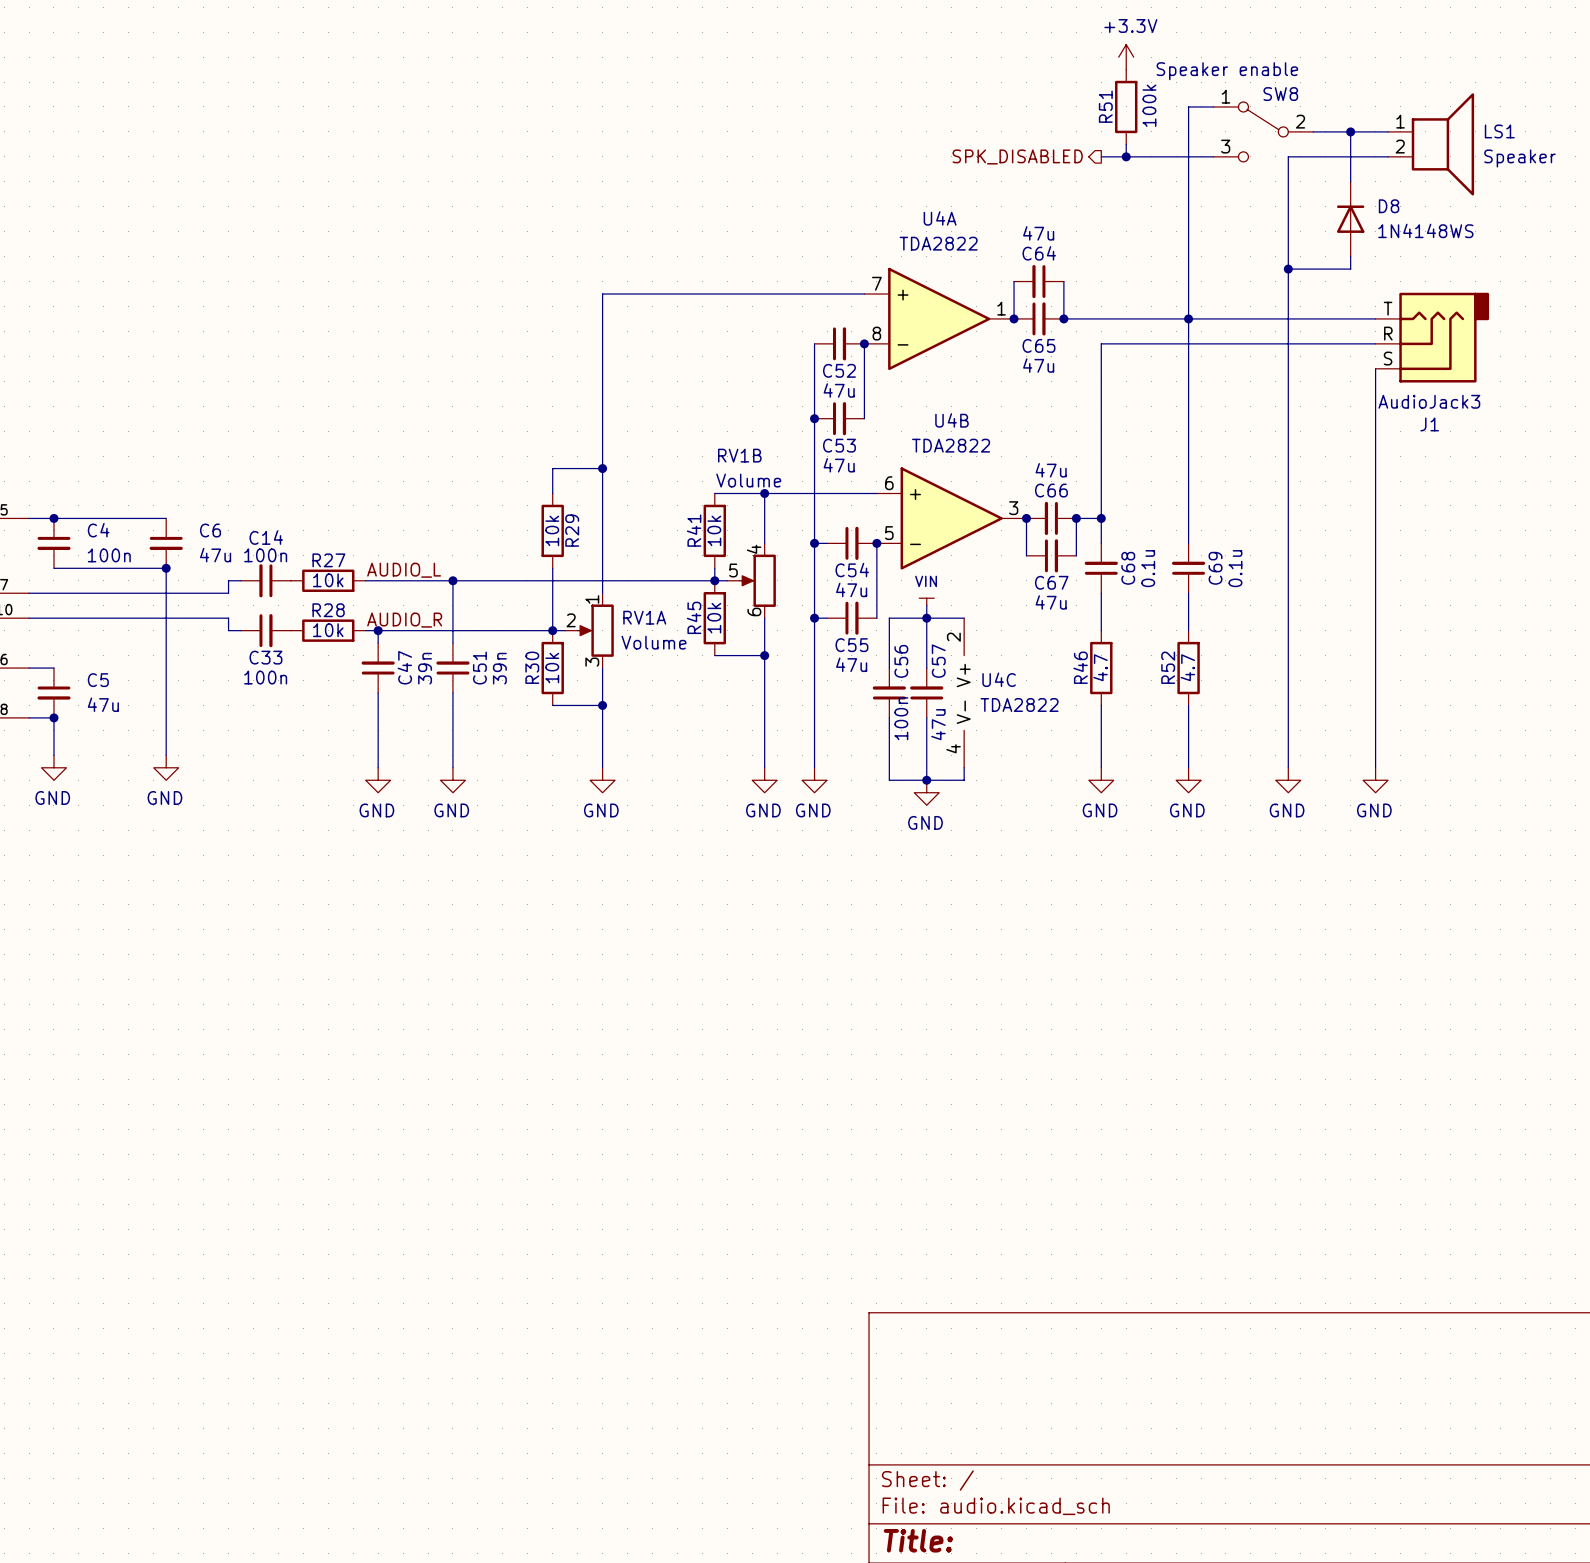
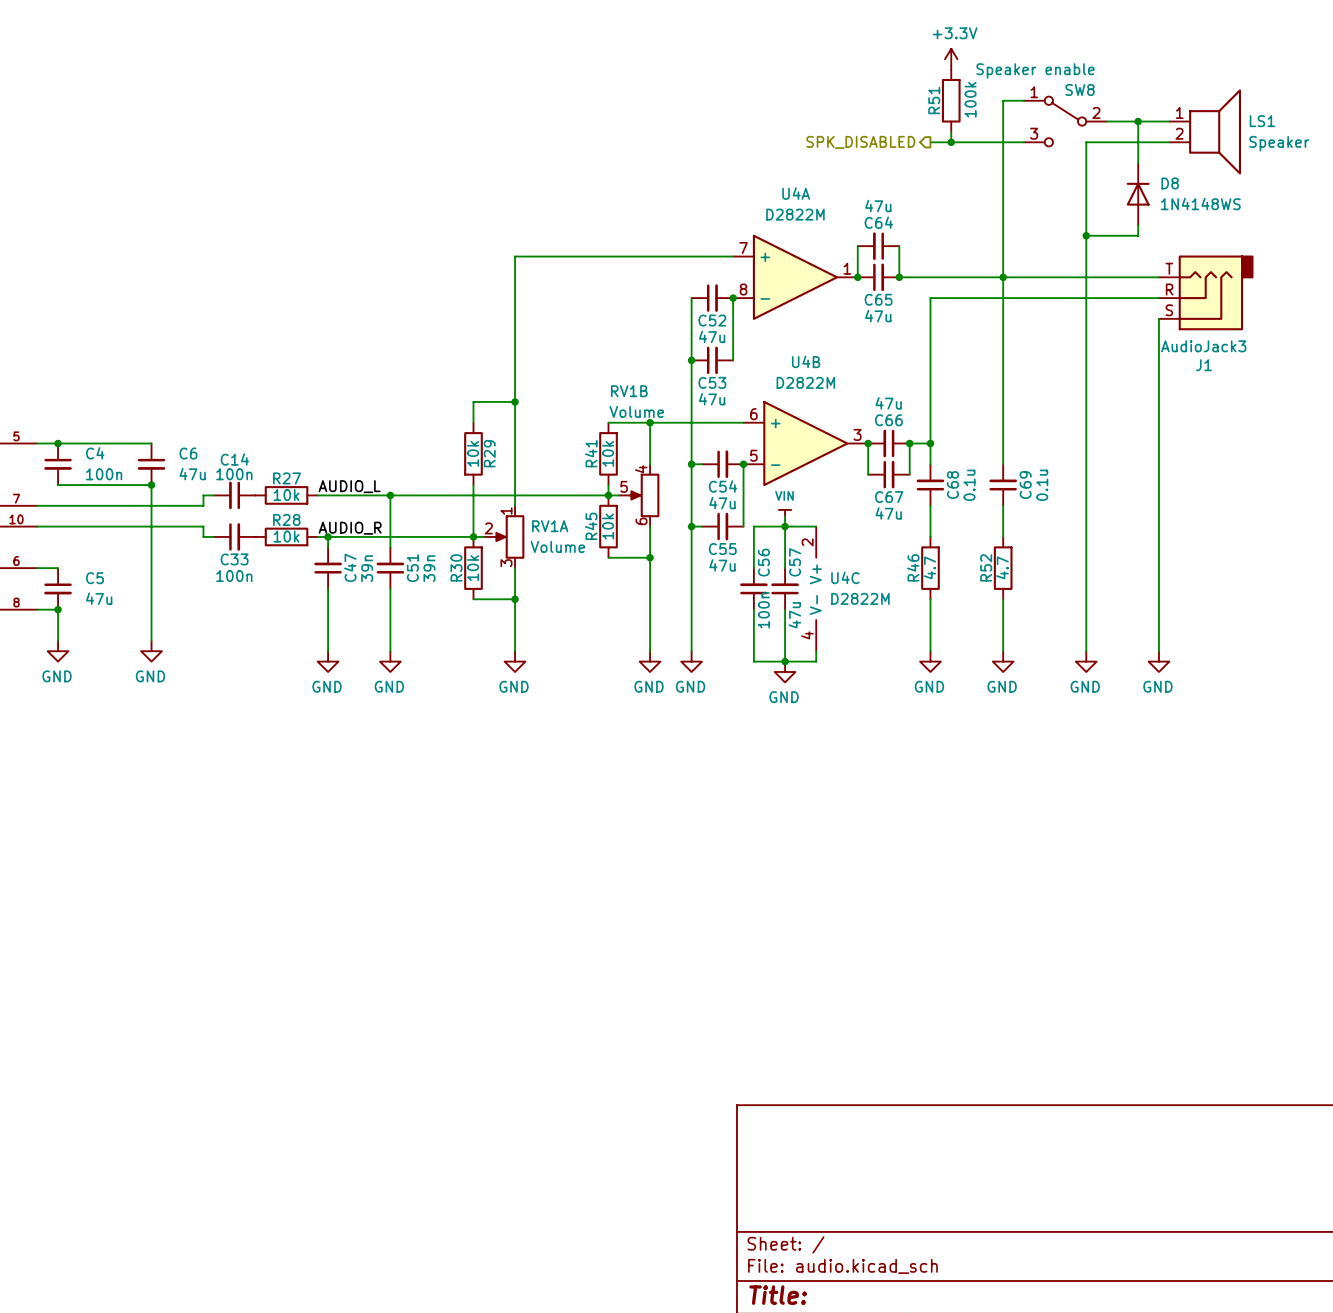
U4A value: TDA2822 (938, 243) -> D2822M (795, 214)
U4B value: TDA2822 (951, 445) -> D2822M (805, 382)
U4C value: TDA2822 (1019, 704) -> D2822M (860, 598)

